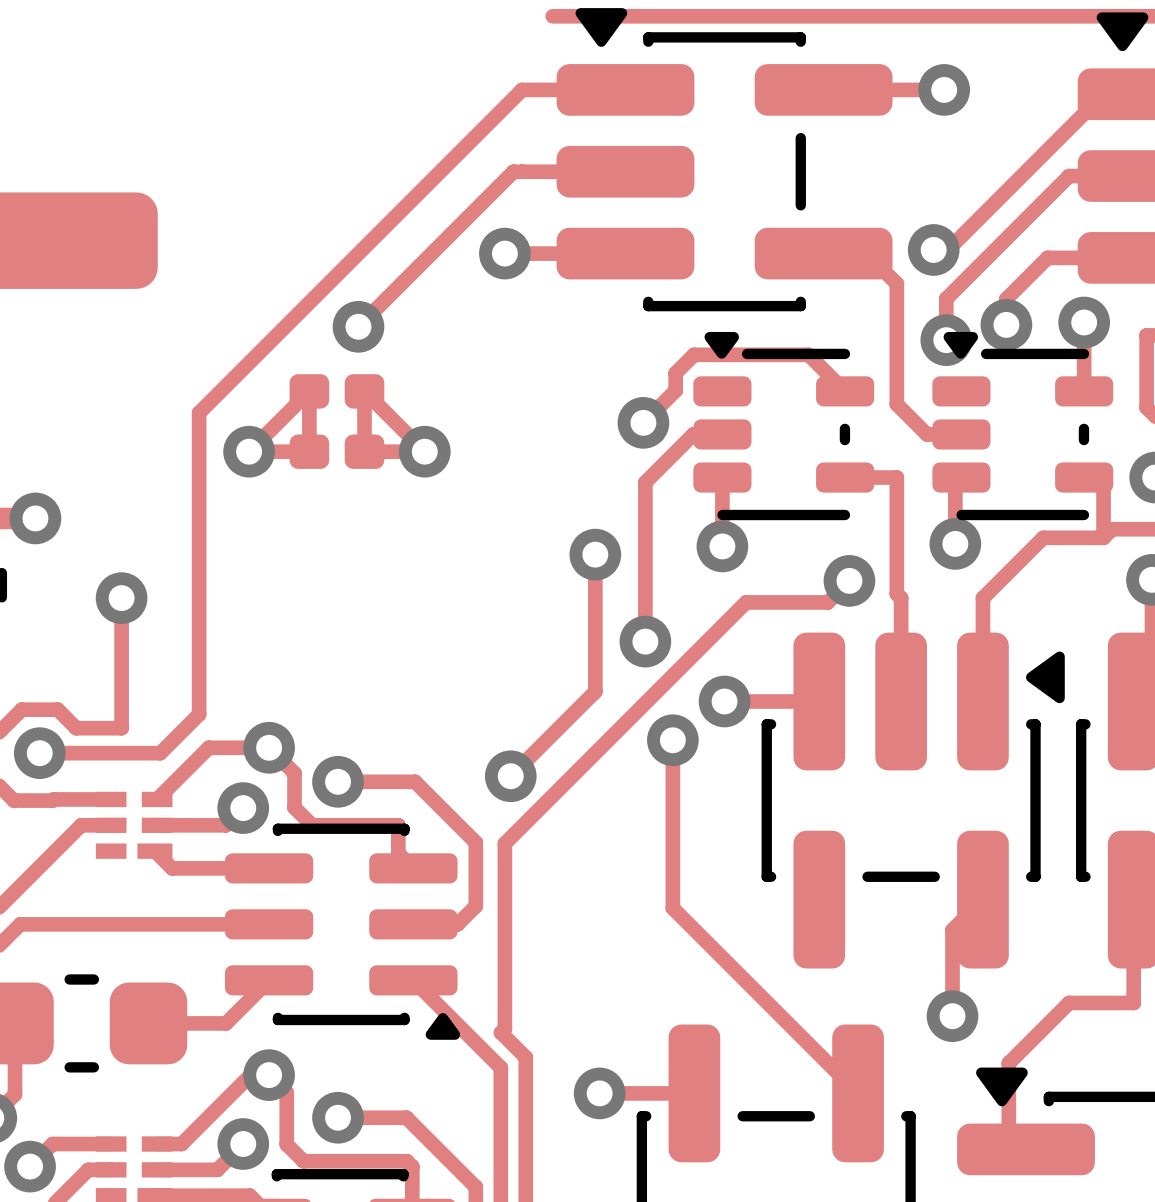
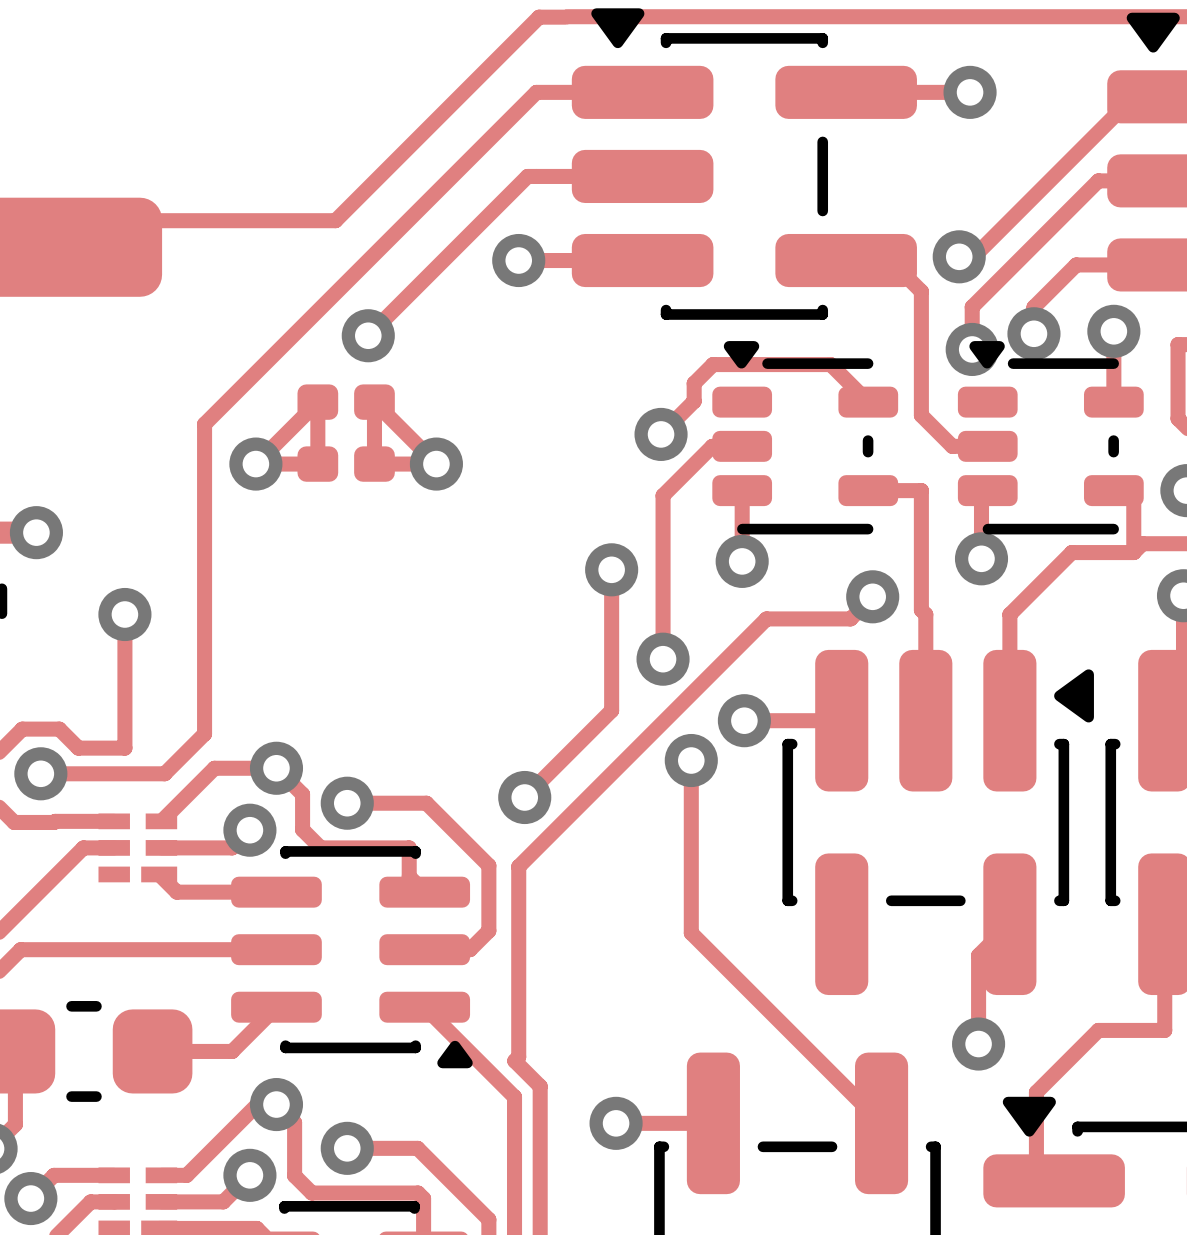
track: none -> (565, 17) (539, 17) (335, 220) (136, 220)

